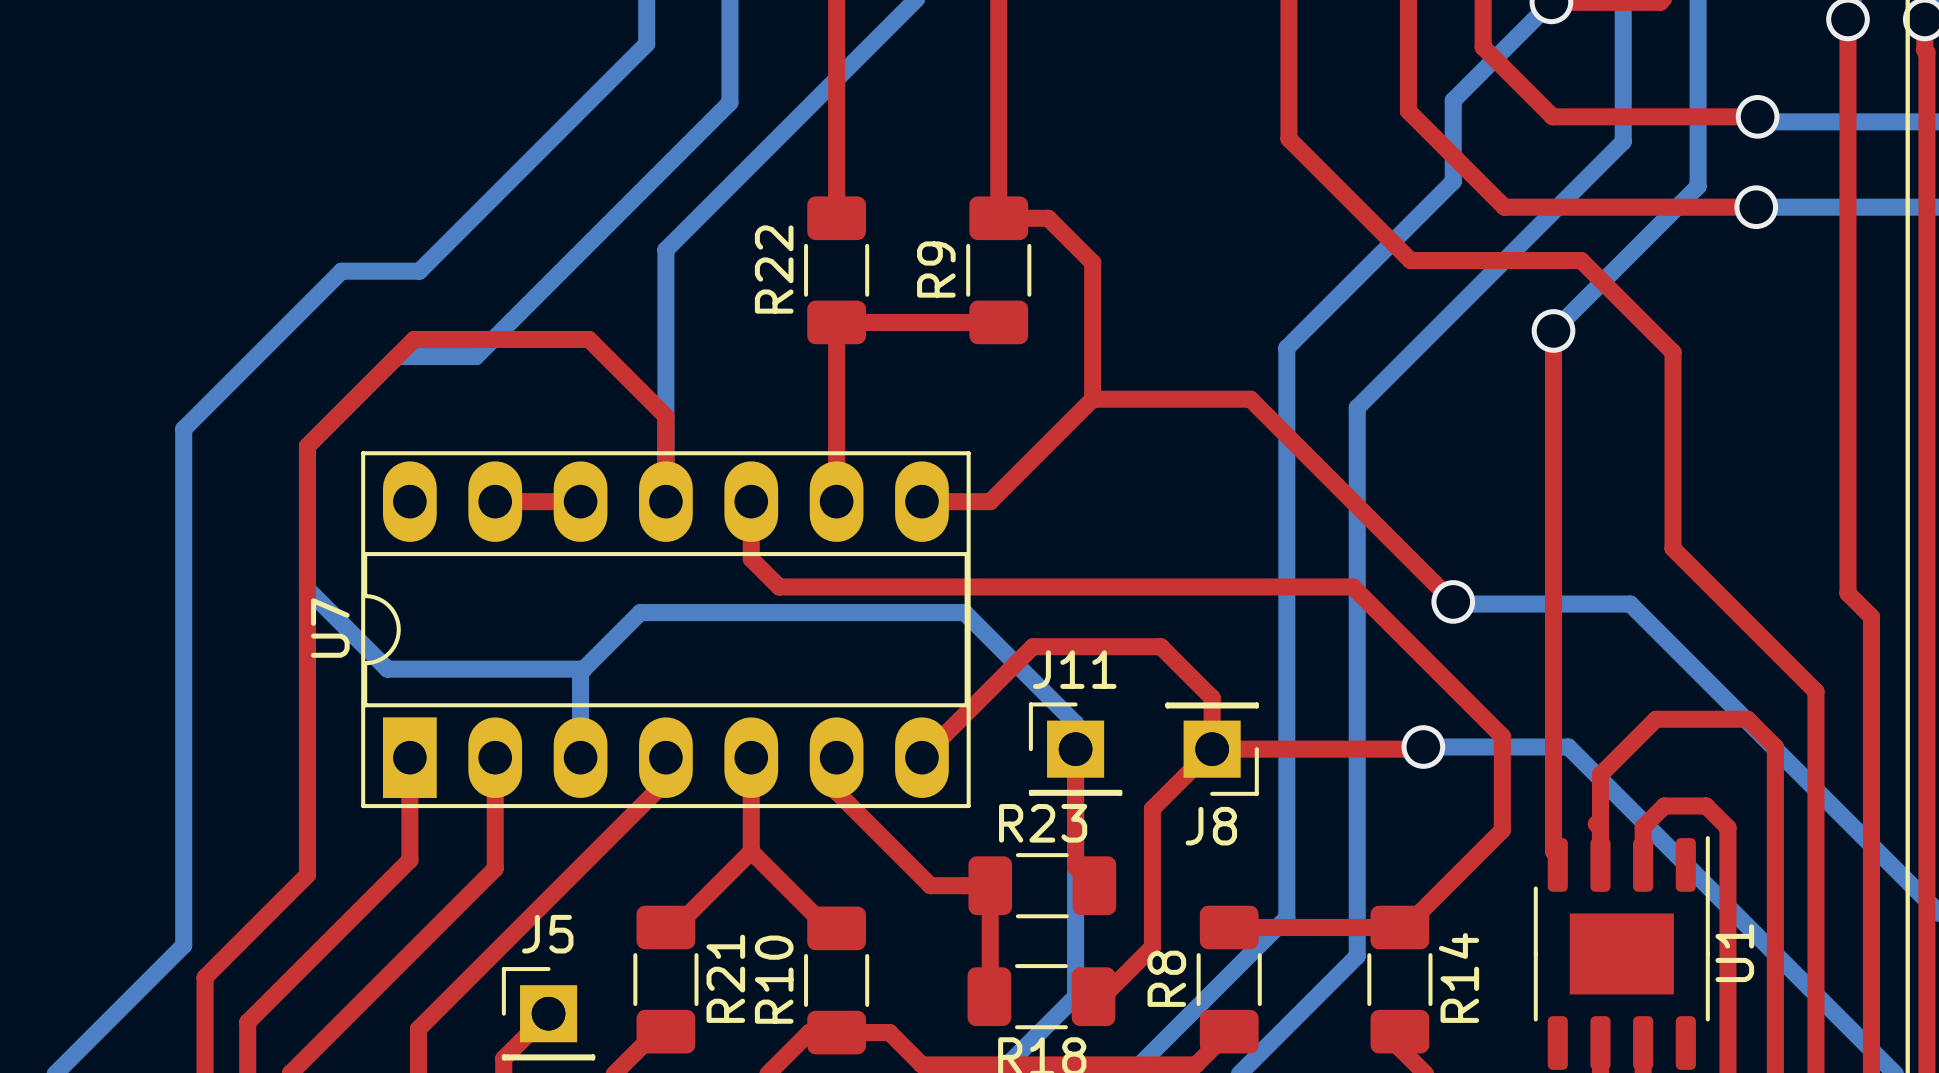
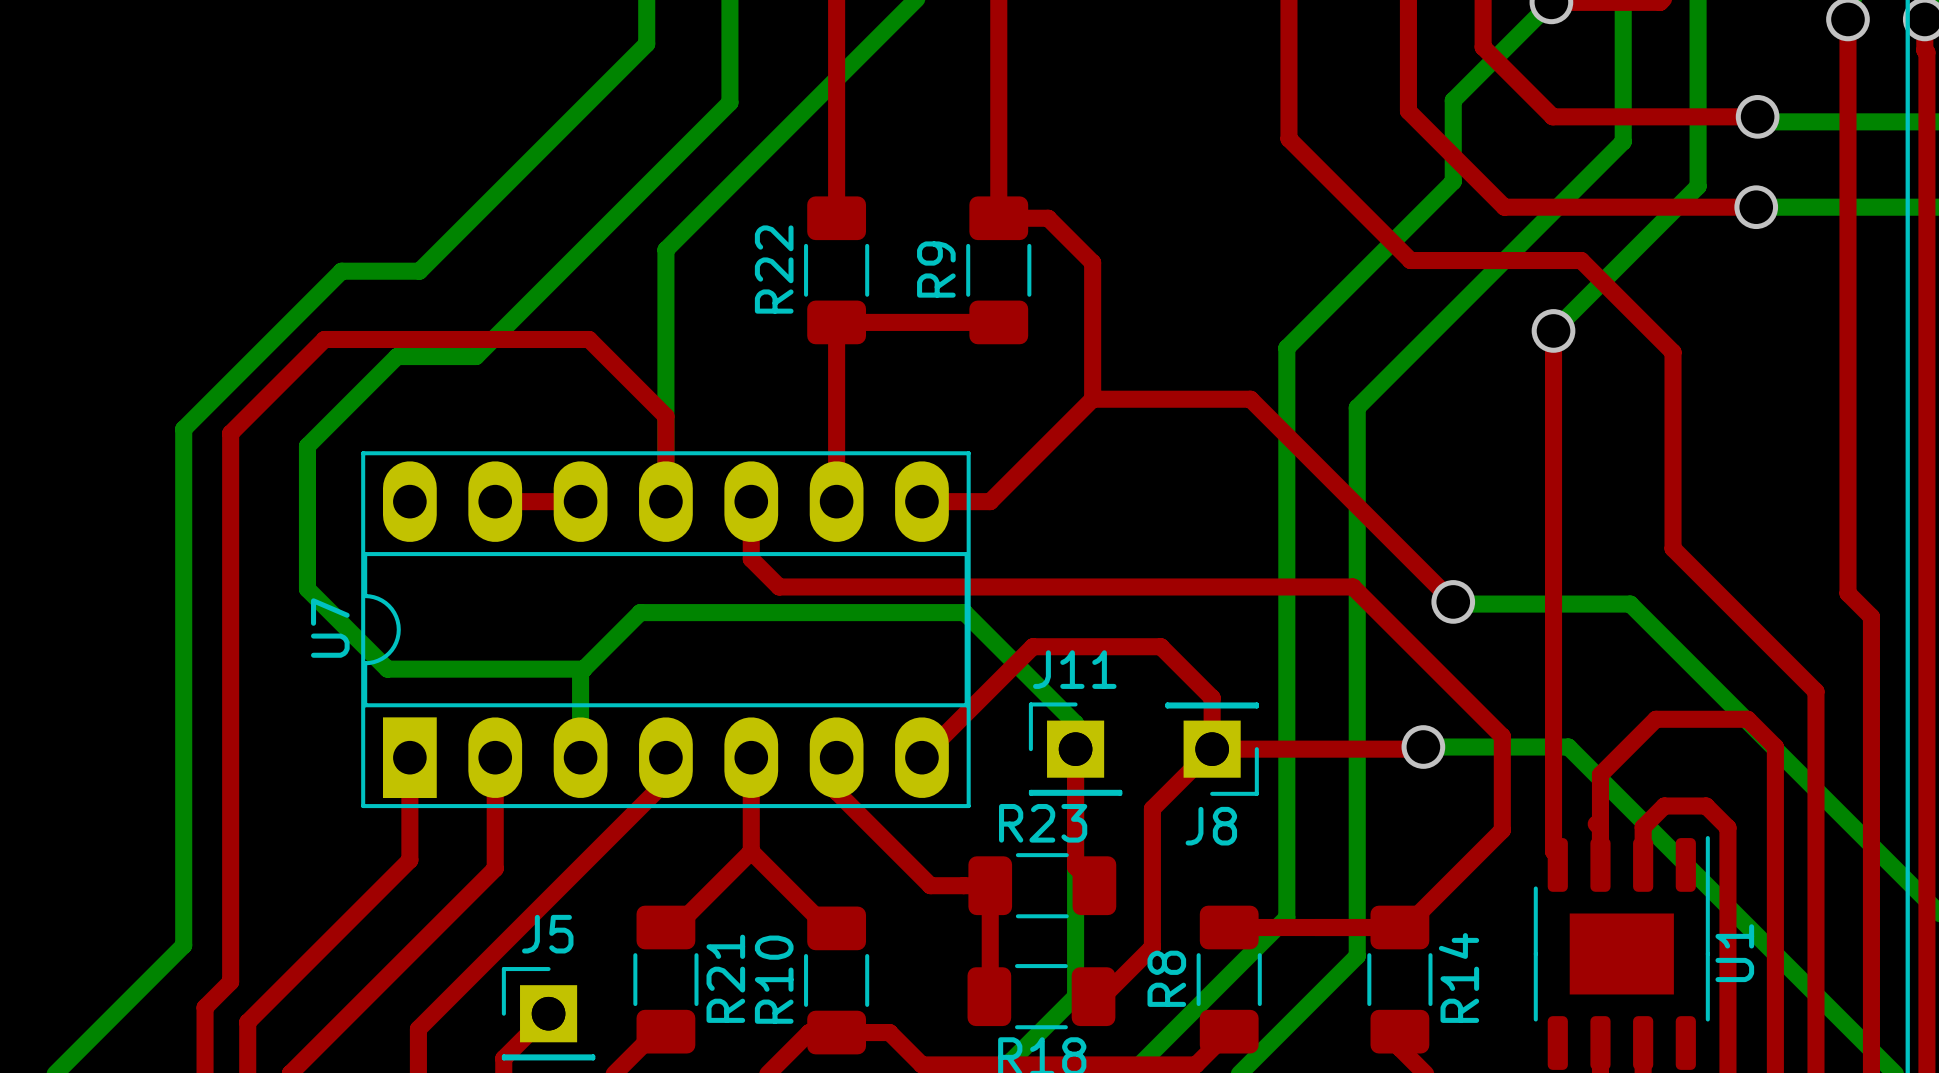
top track: (414, 339) (307, 446) (307, 875) (205, 977) (205, 1007) -> (414, 339) (324, 339) (230, 433) (230, 981) (205, 1007)

